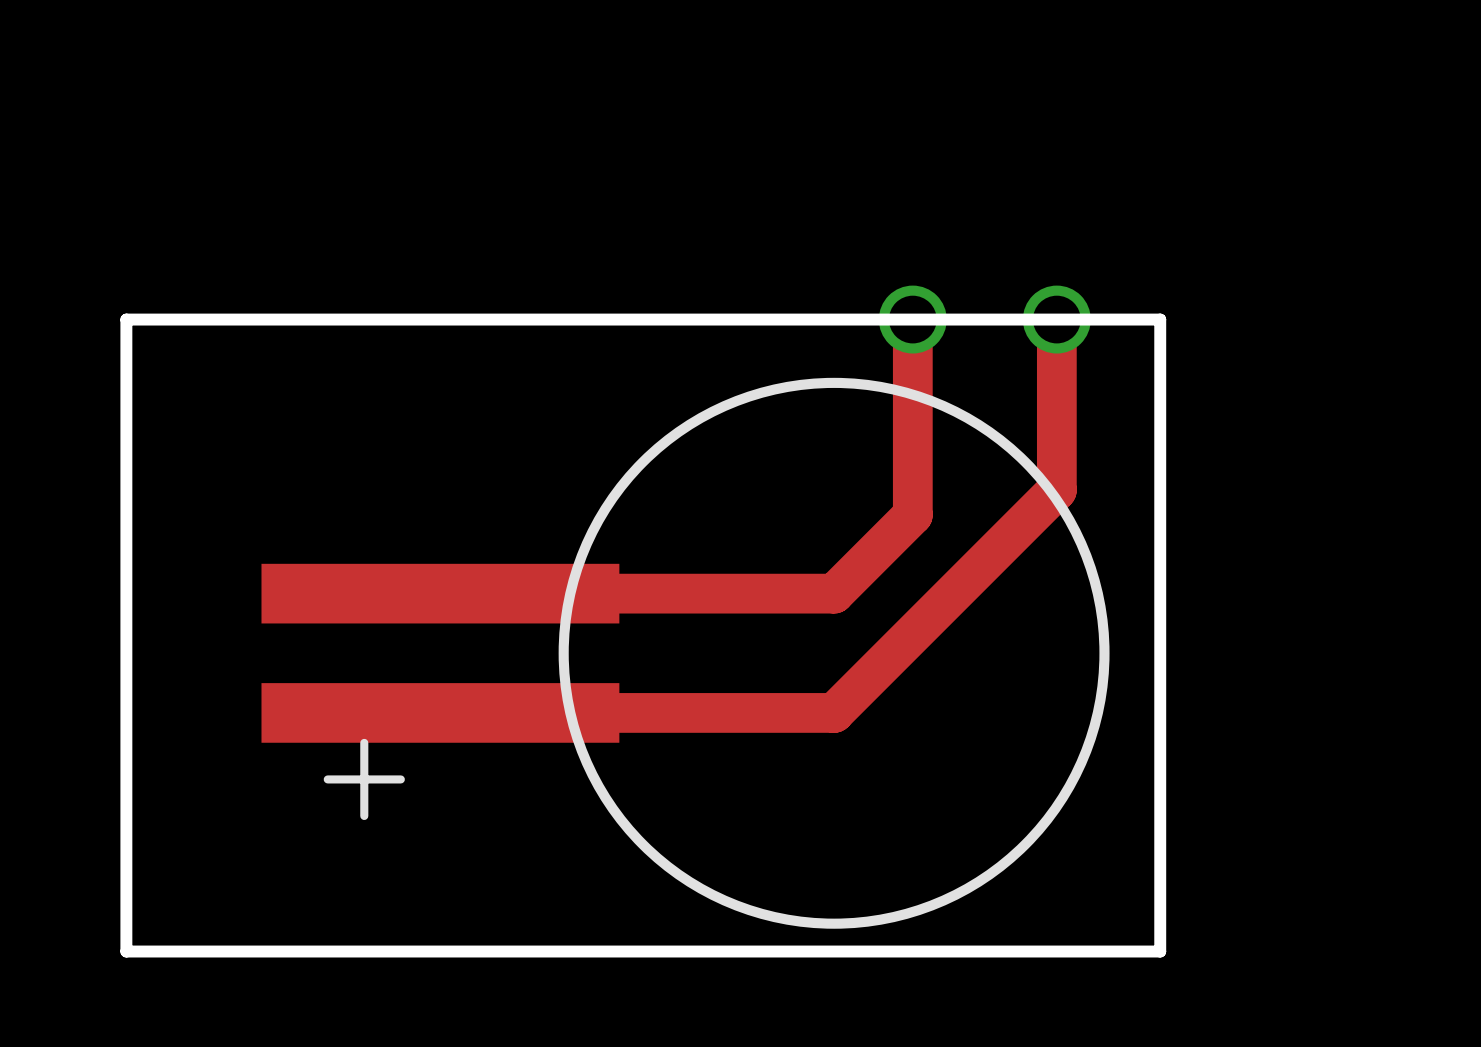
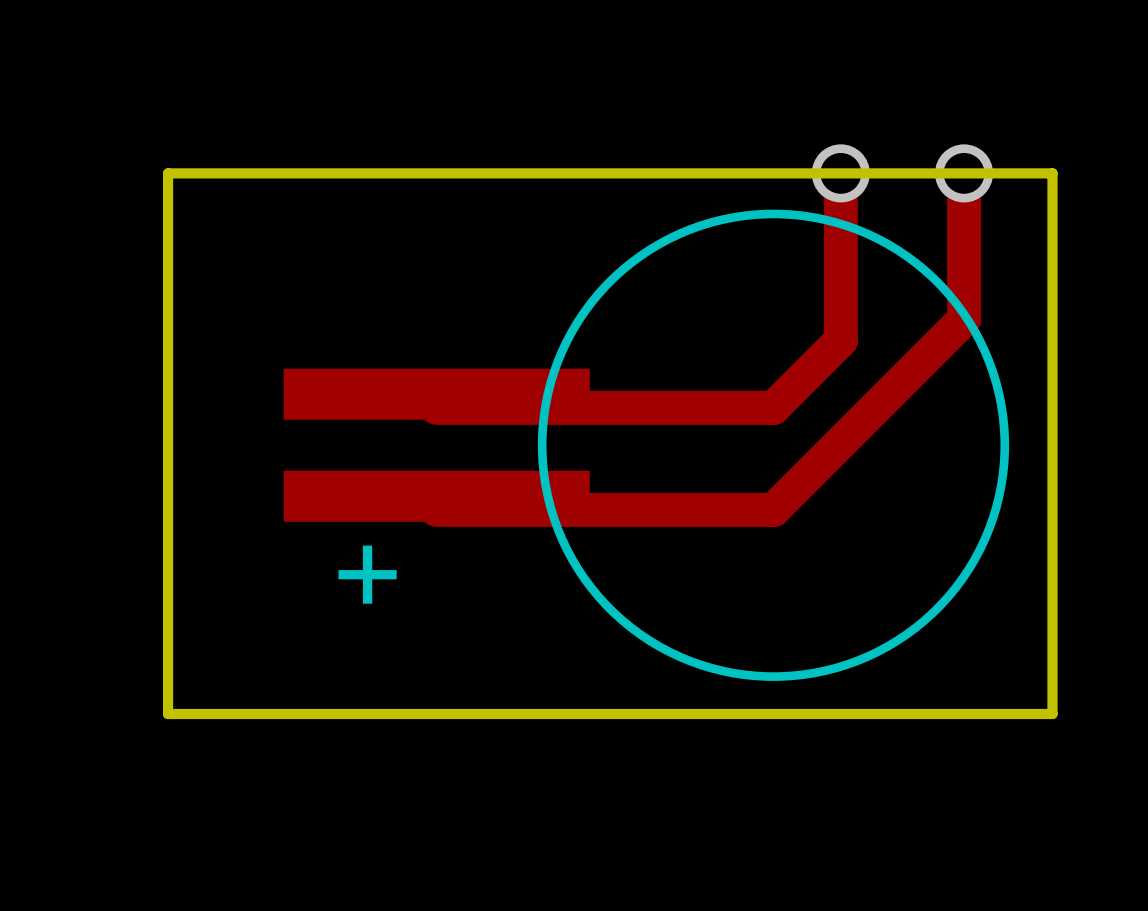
part position: (685, 653) -> (646, 445)

